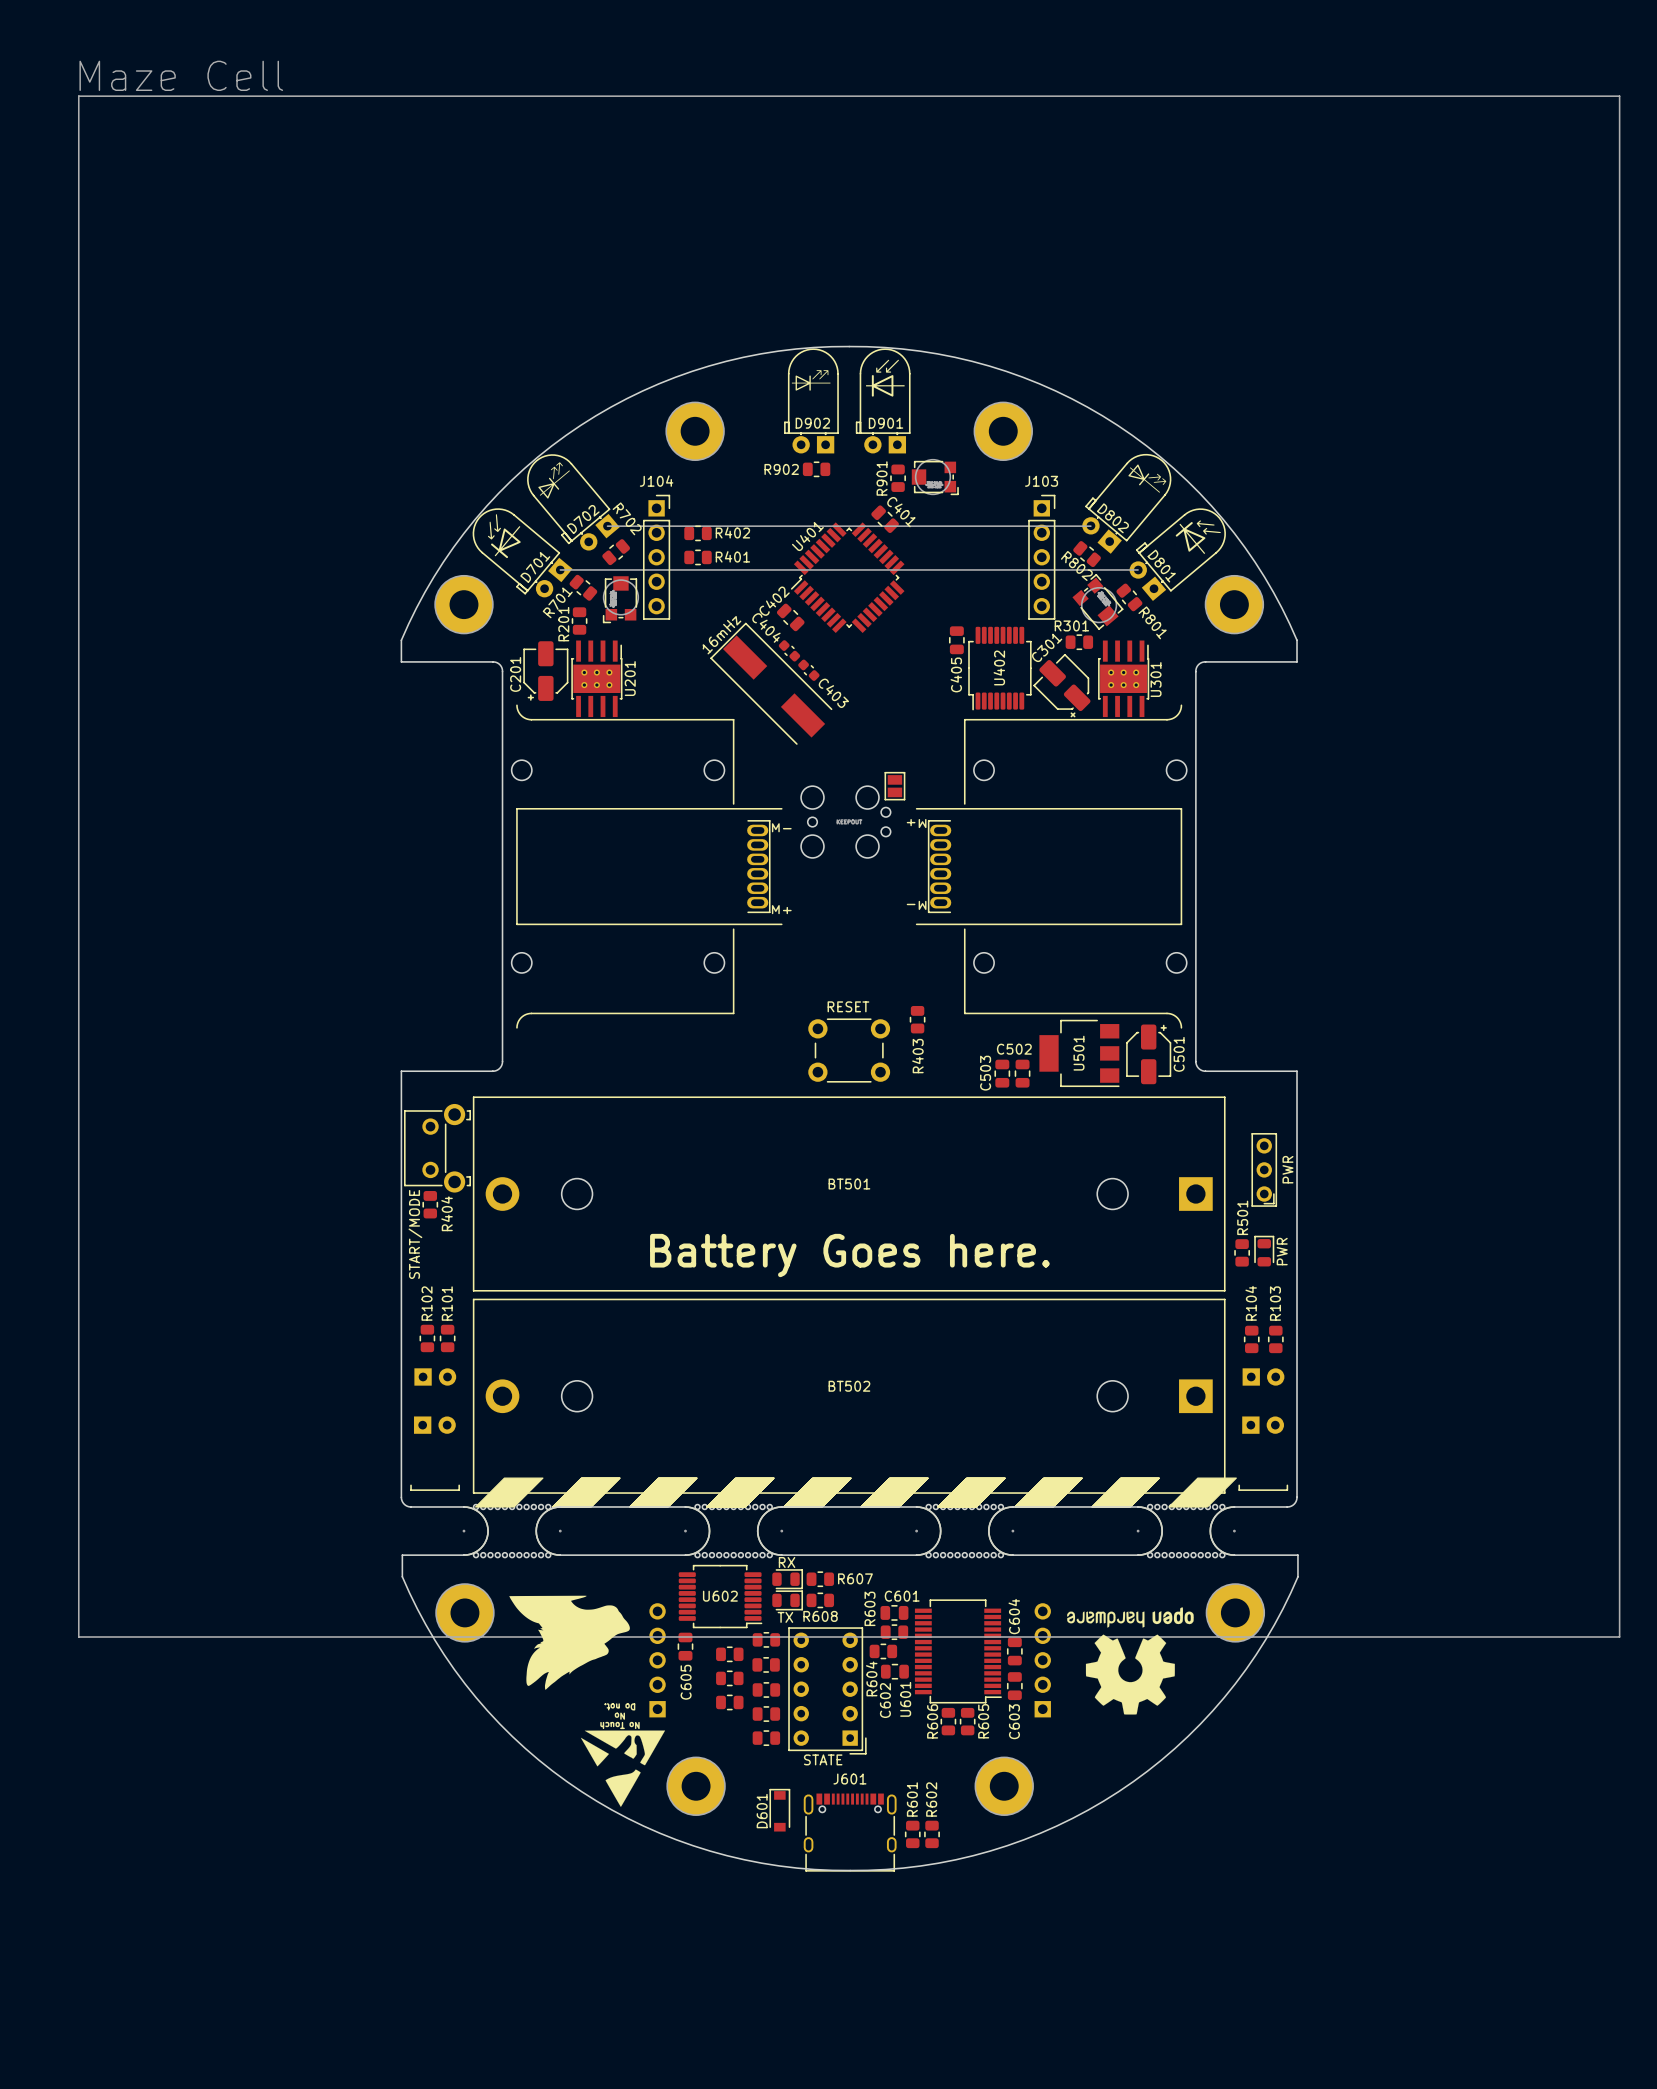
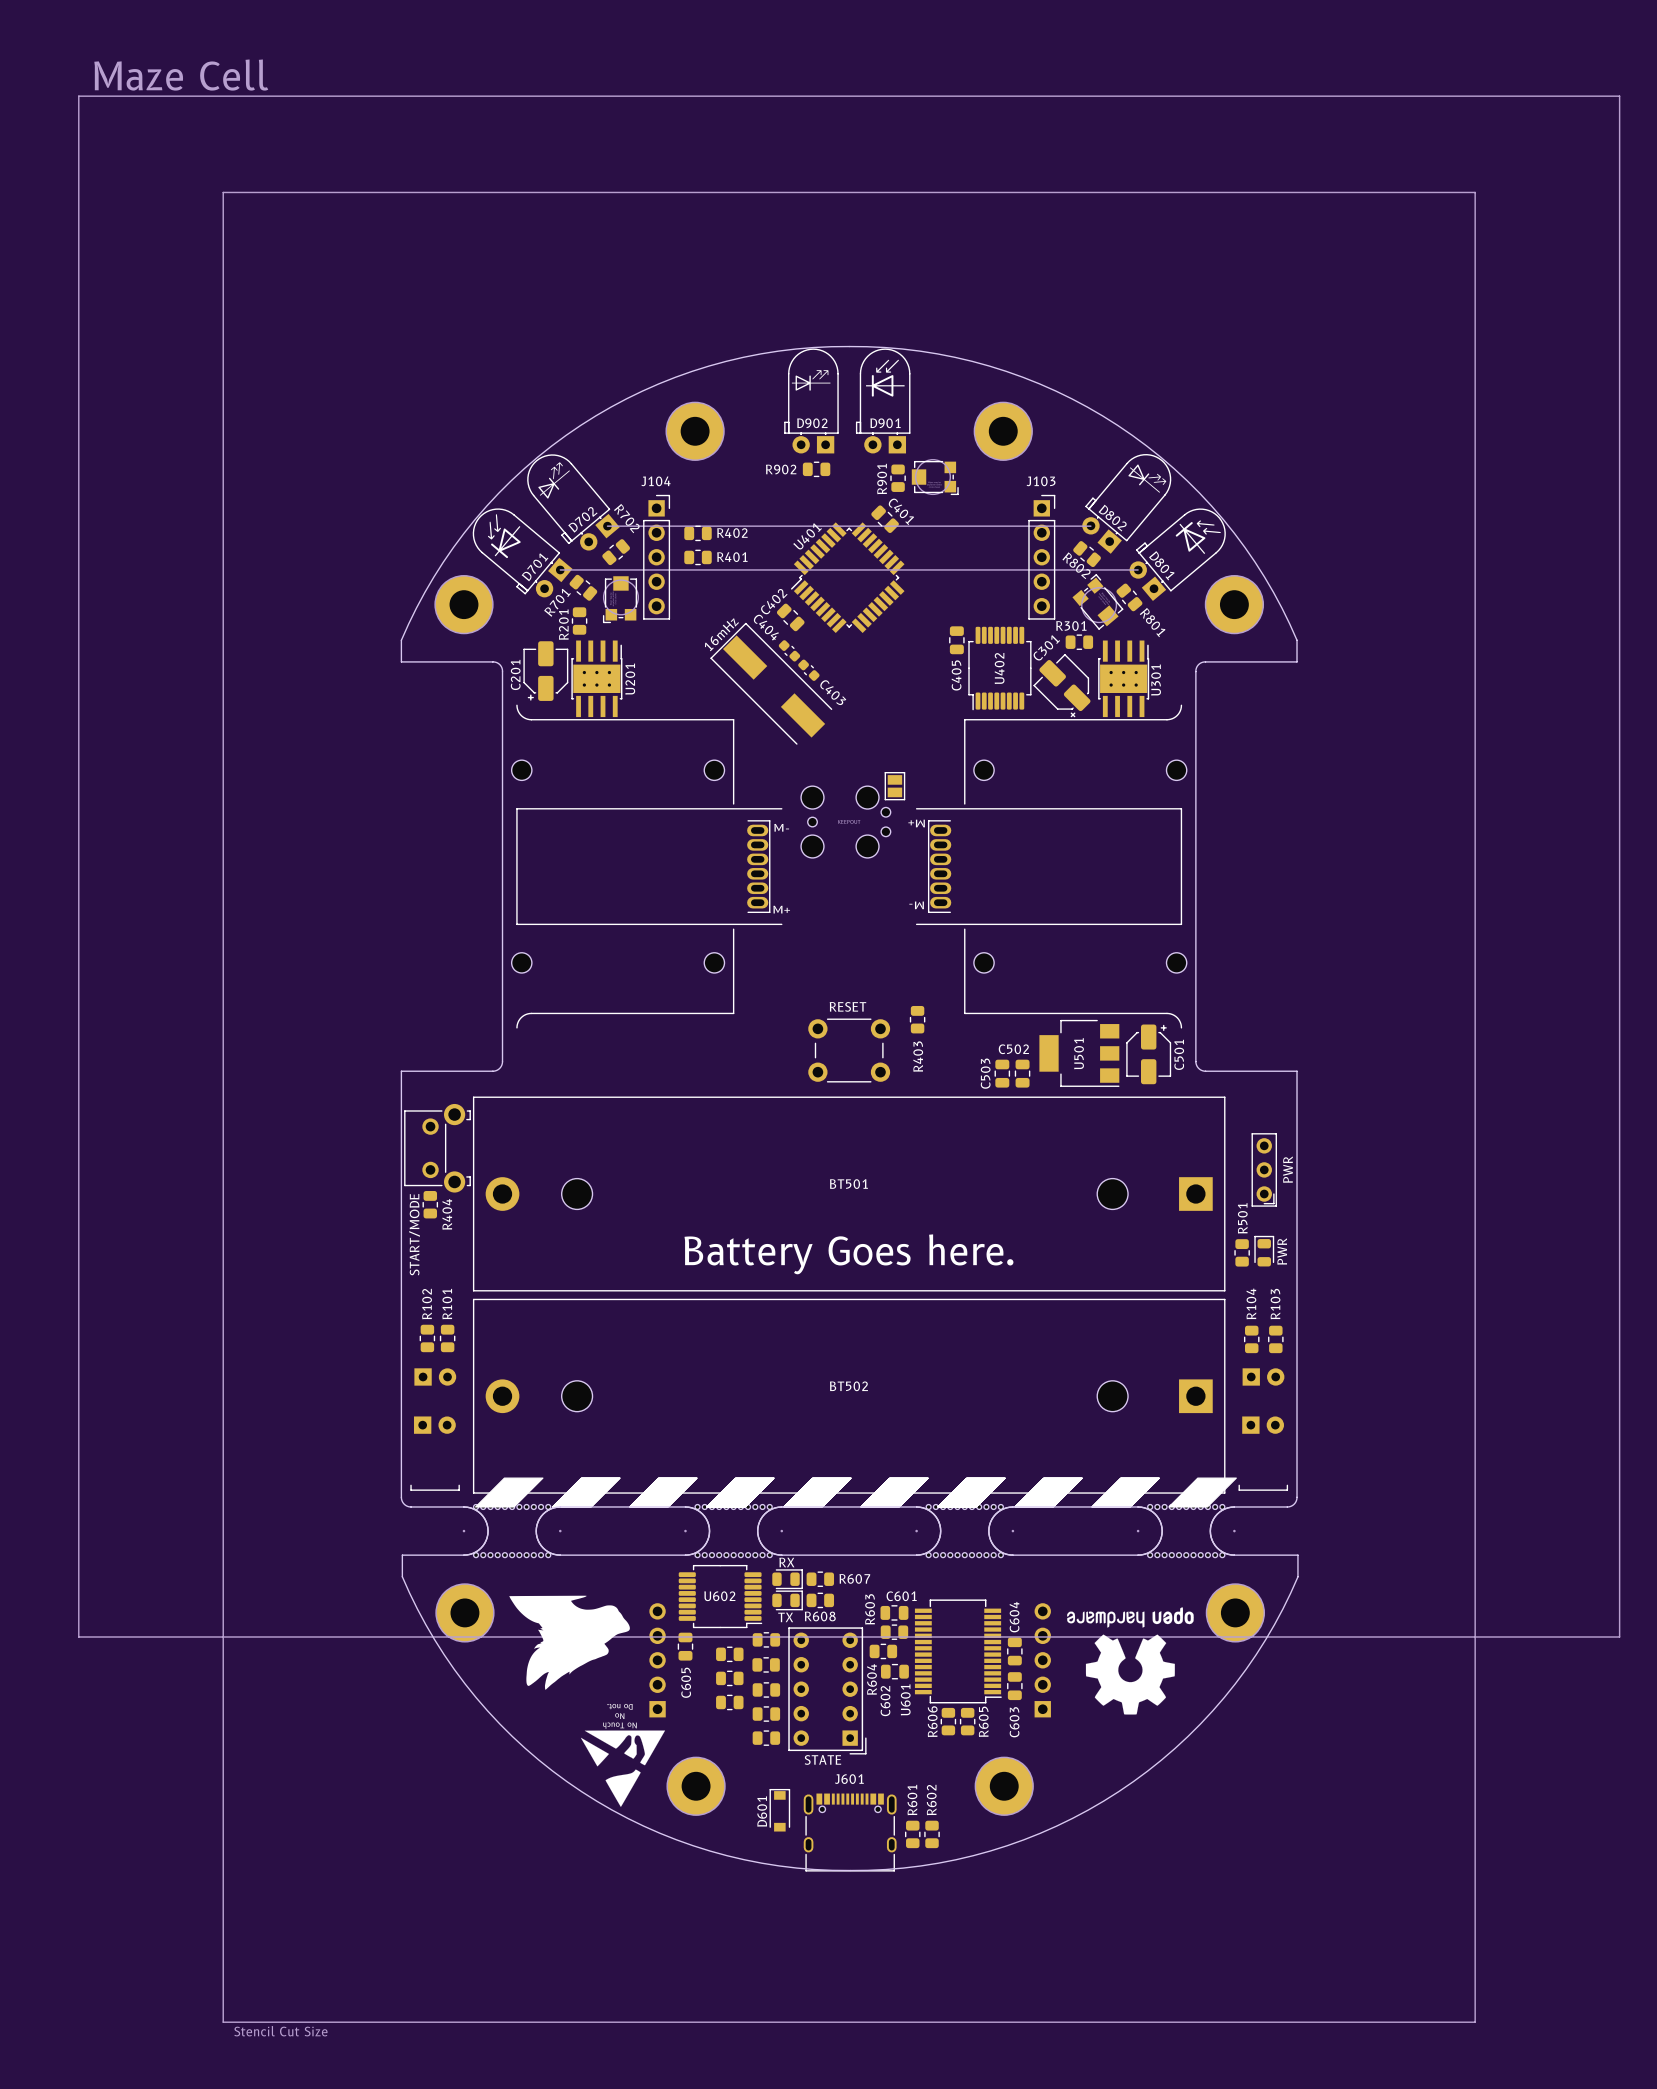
line: none -> (223, 192) (1475, 192) (1475, 2022) (223, 2022) (223, 192)
text: none -> Stencil Cut Size (280, 2031)

